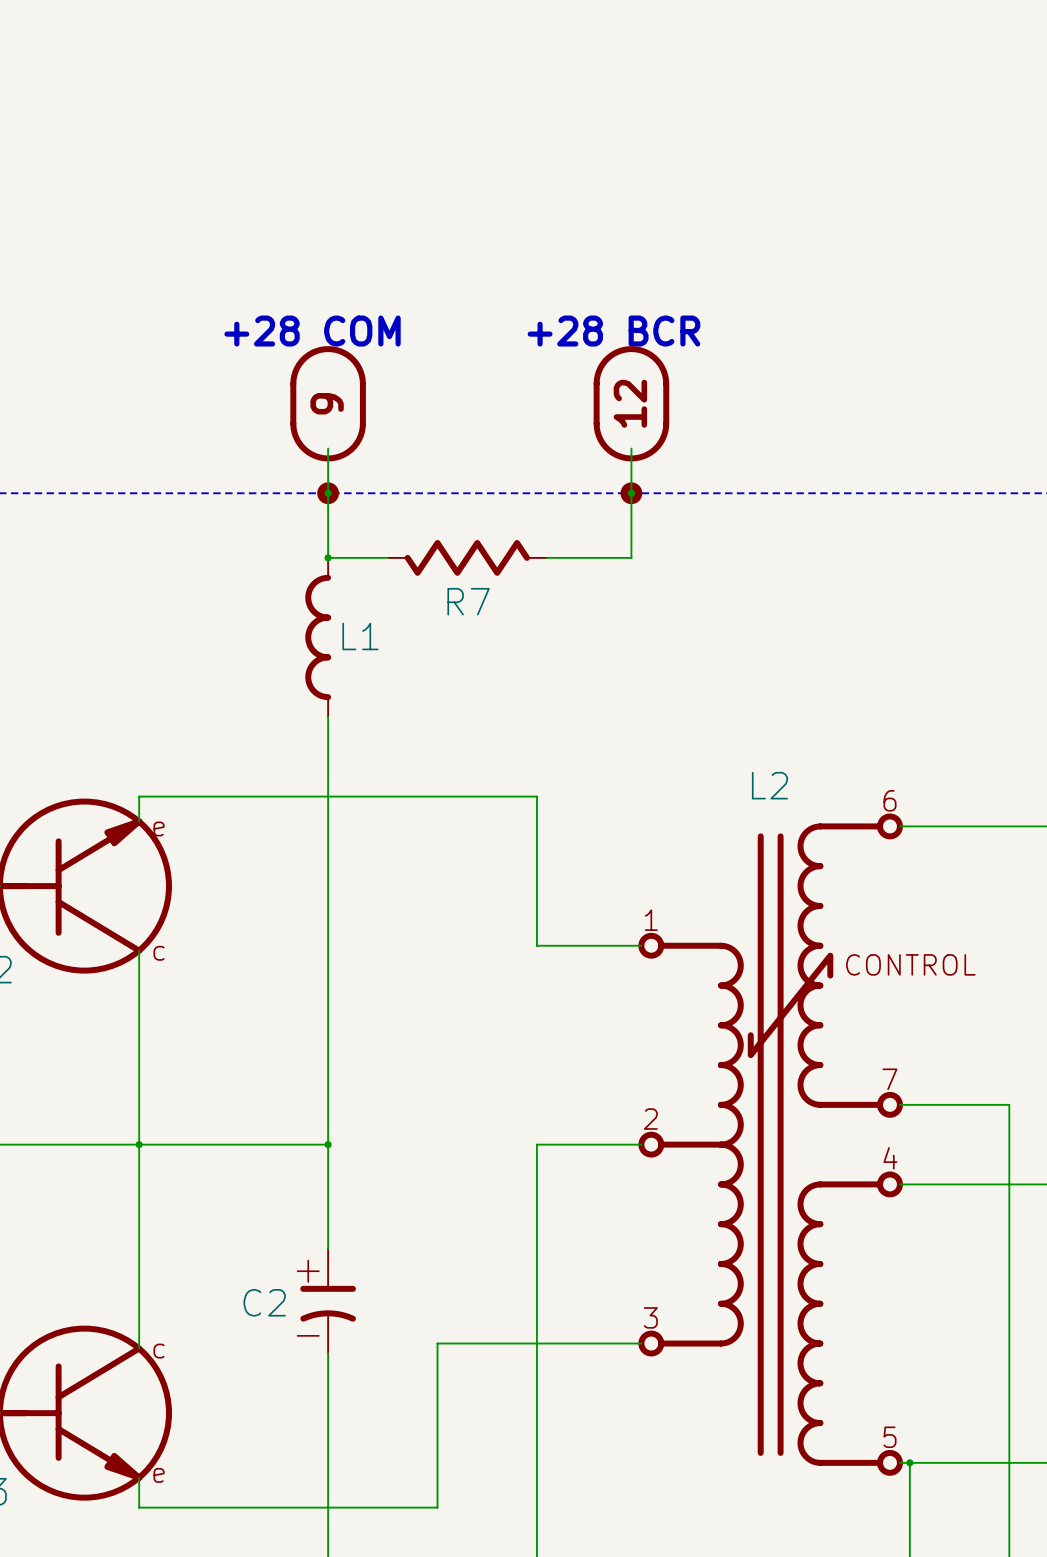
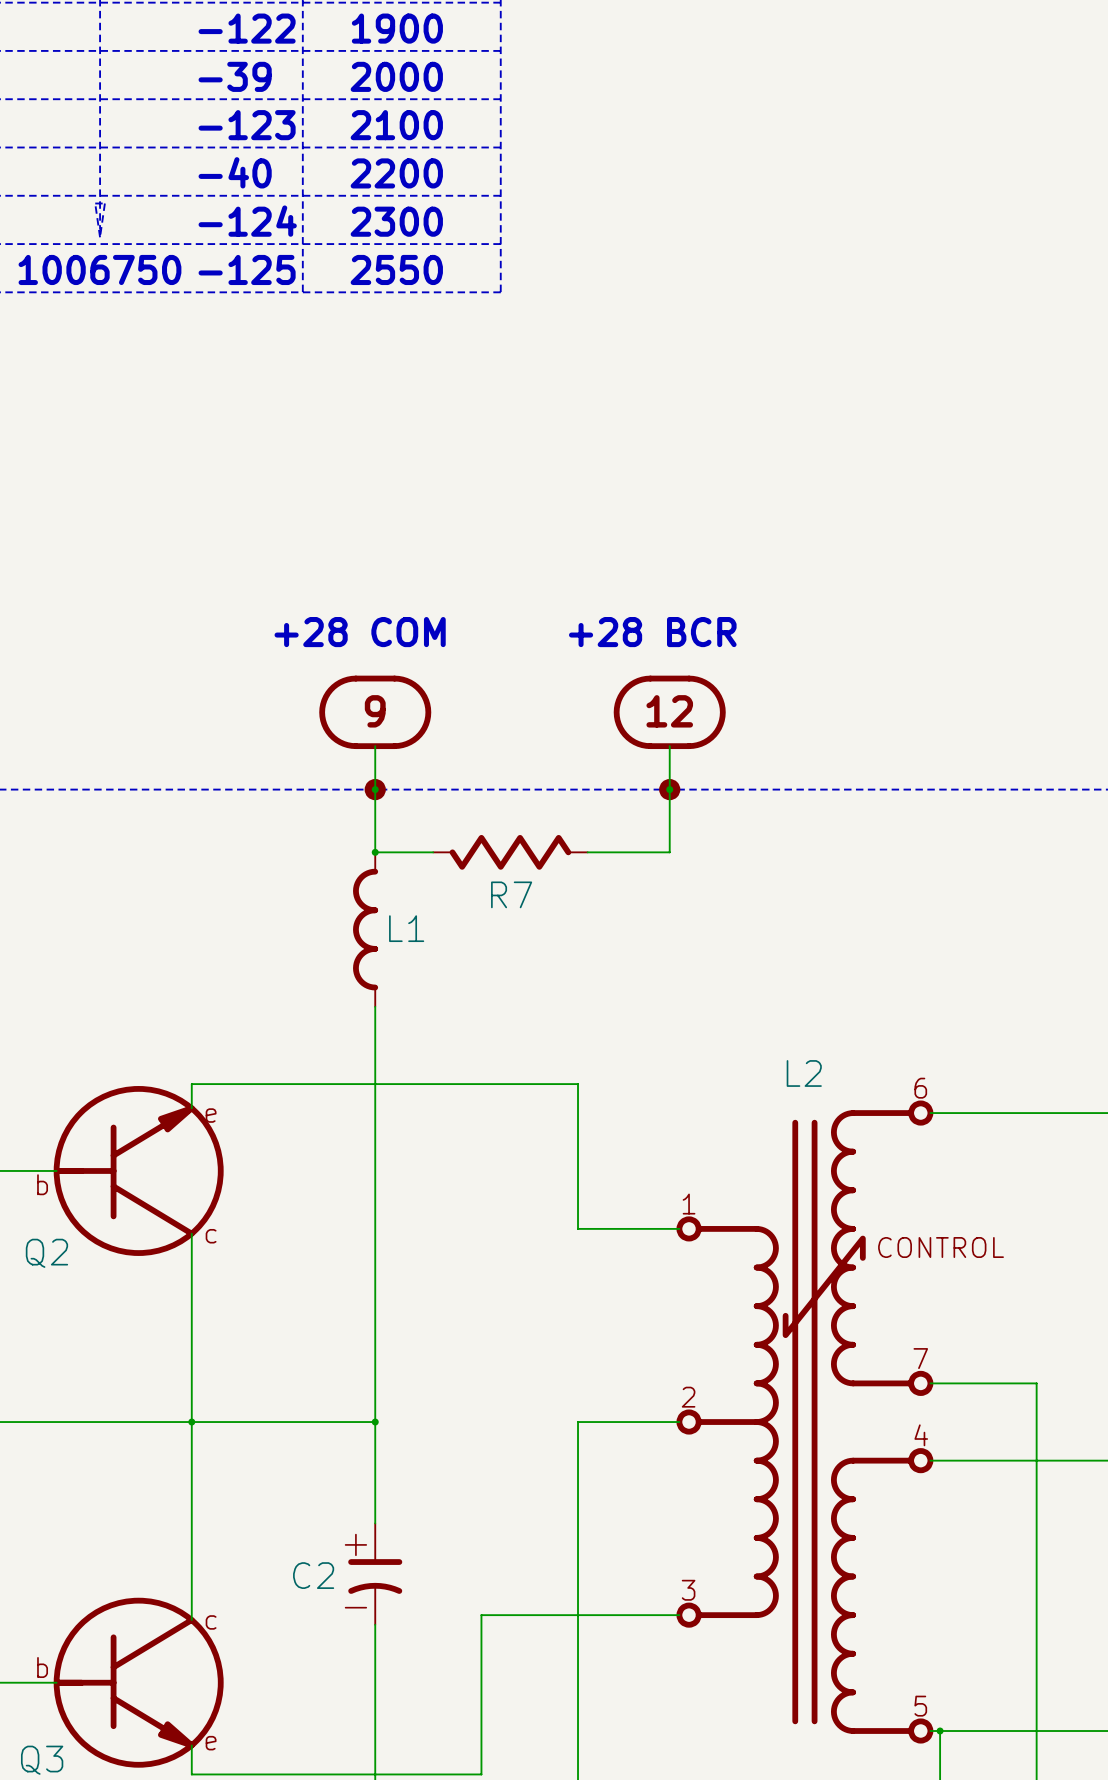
part rotation: 0° (328, 403) -> 90° clockwise (375, 712)
part rotation: 0° (631, 403) -> 90° clockwise (669, 712)

